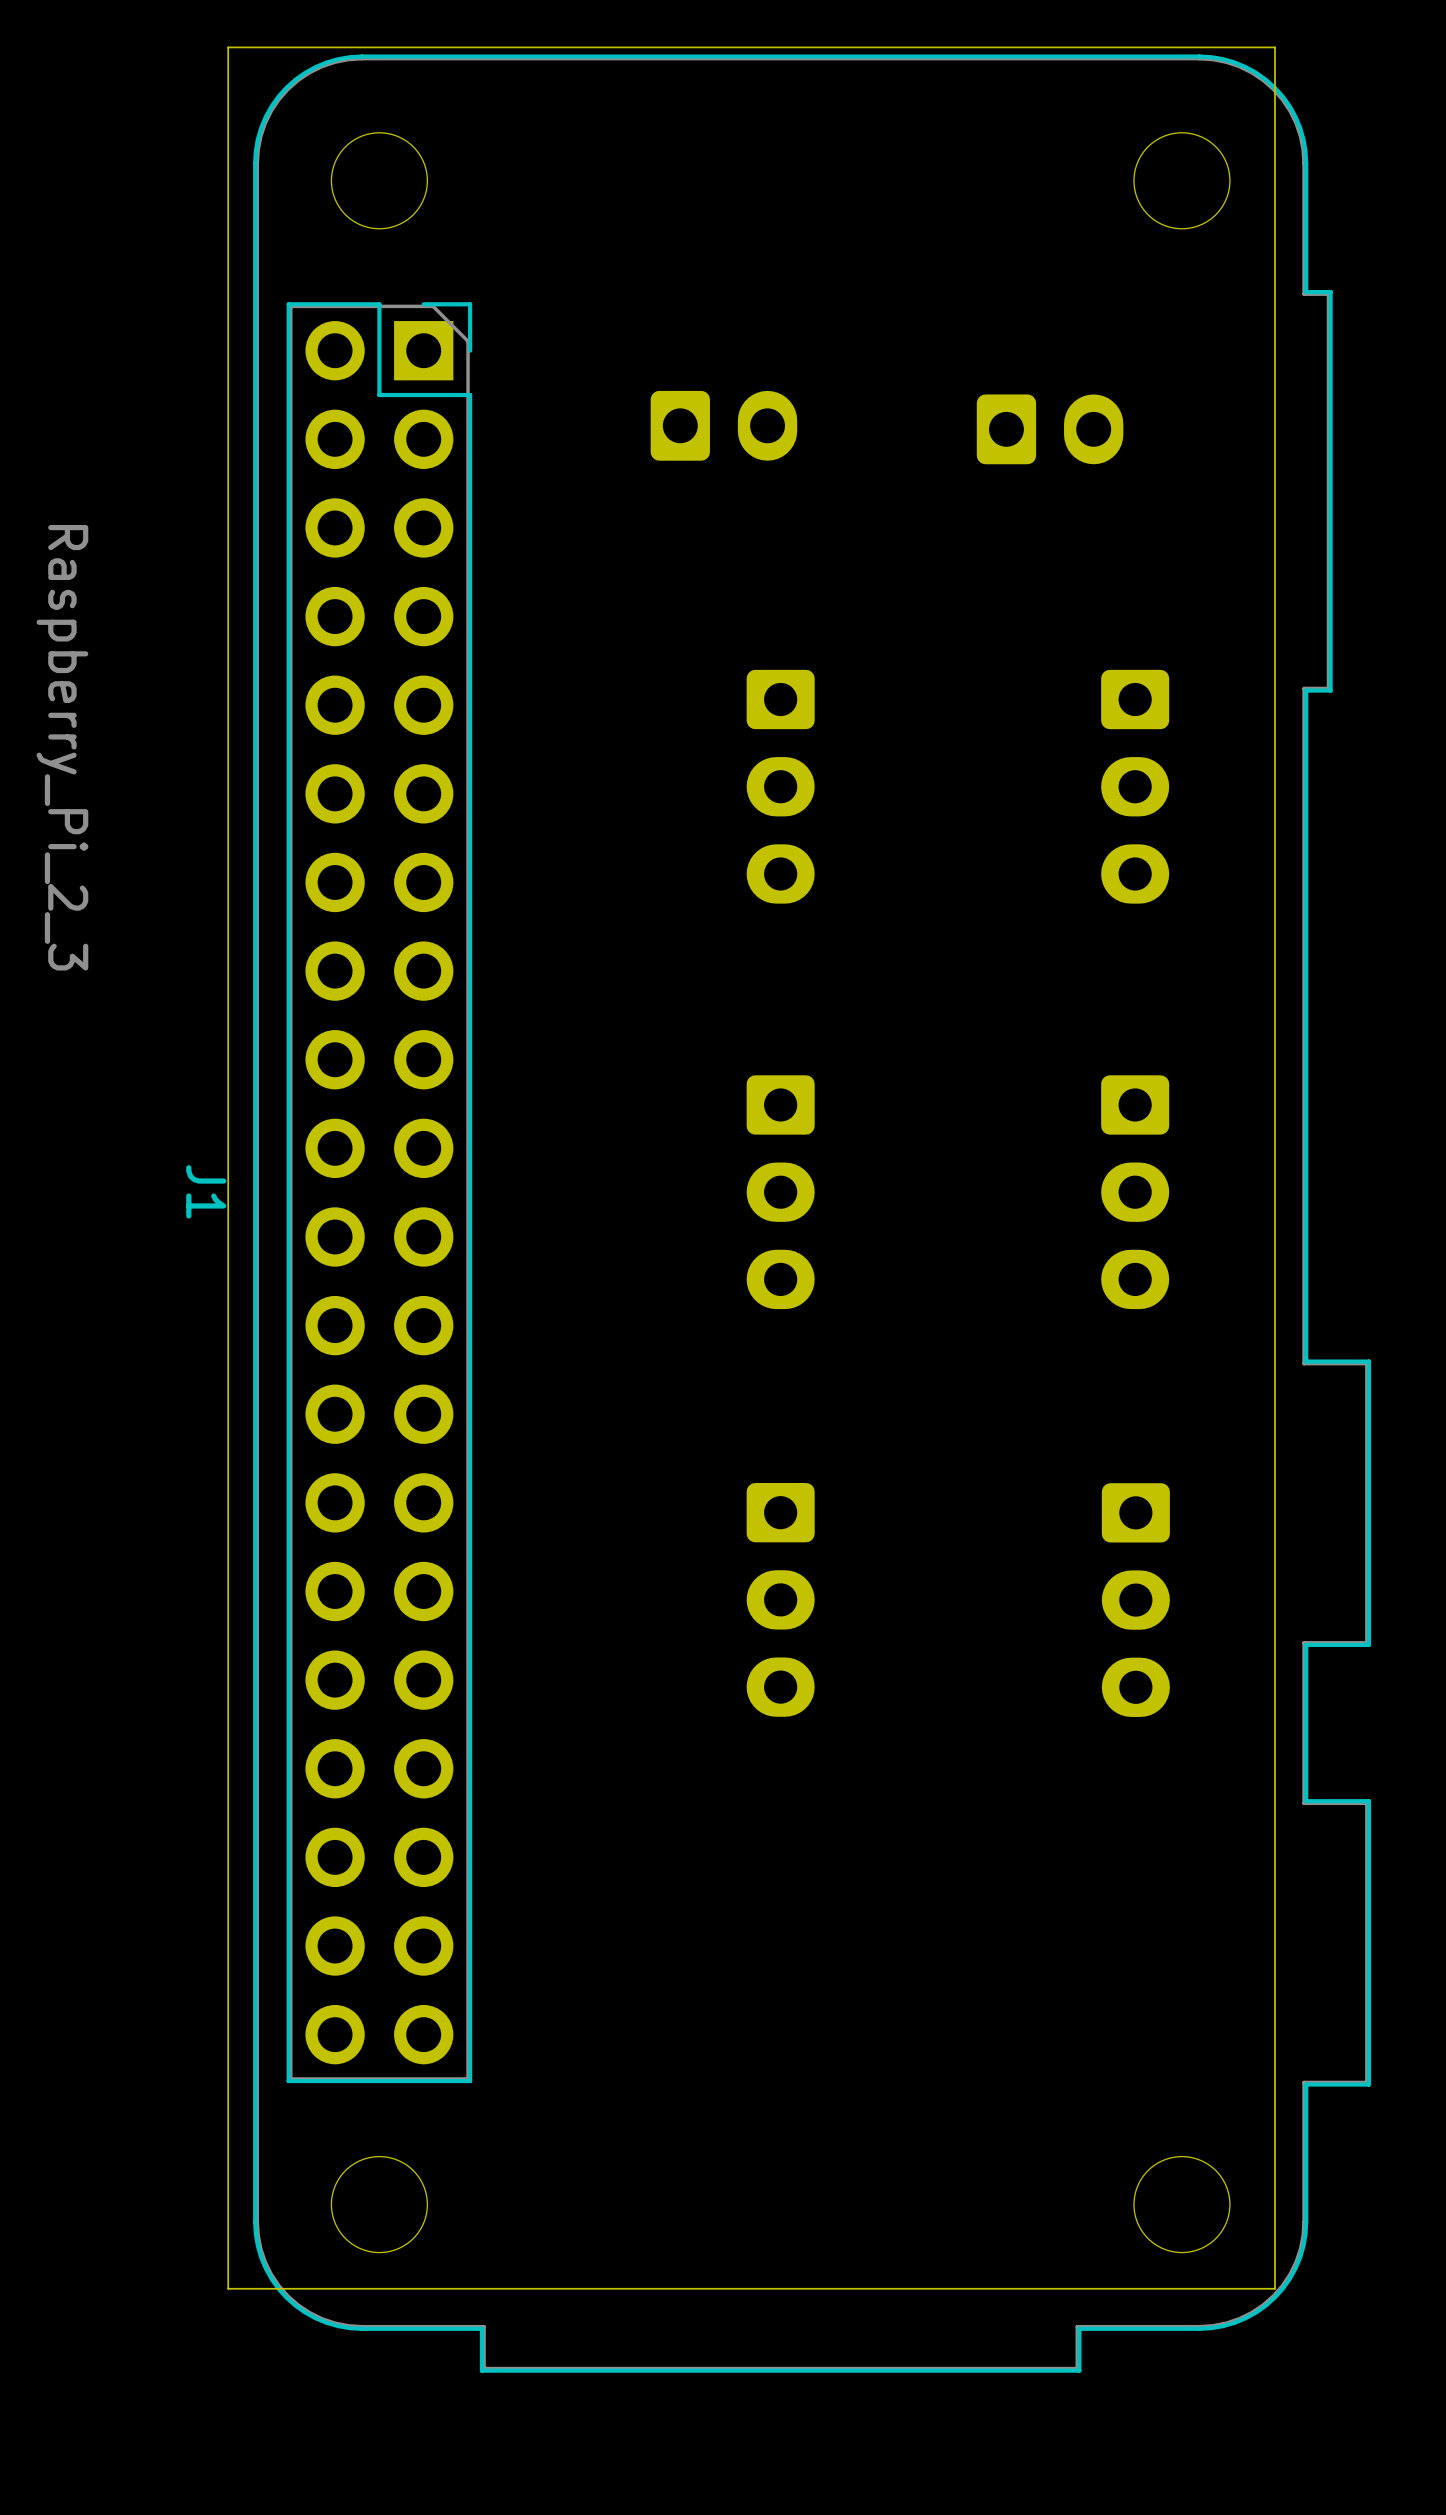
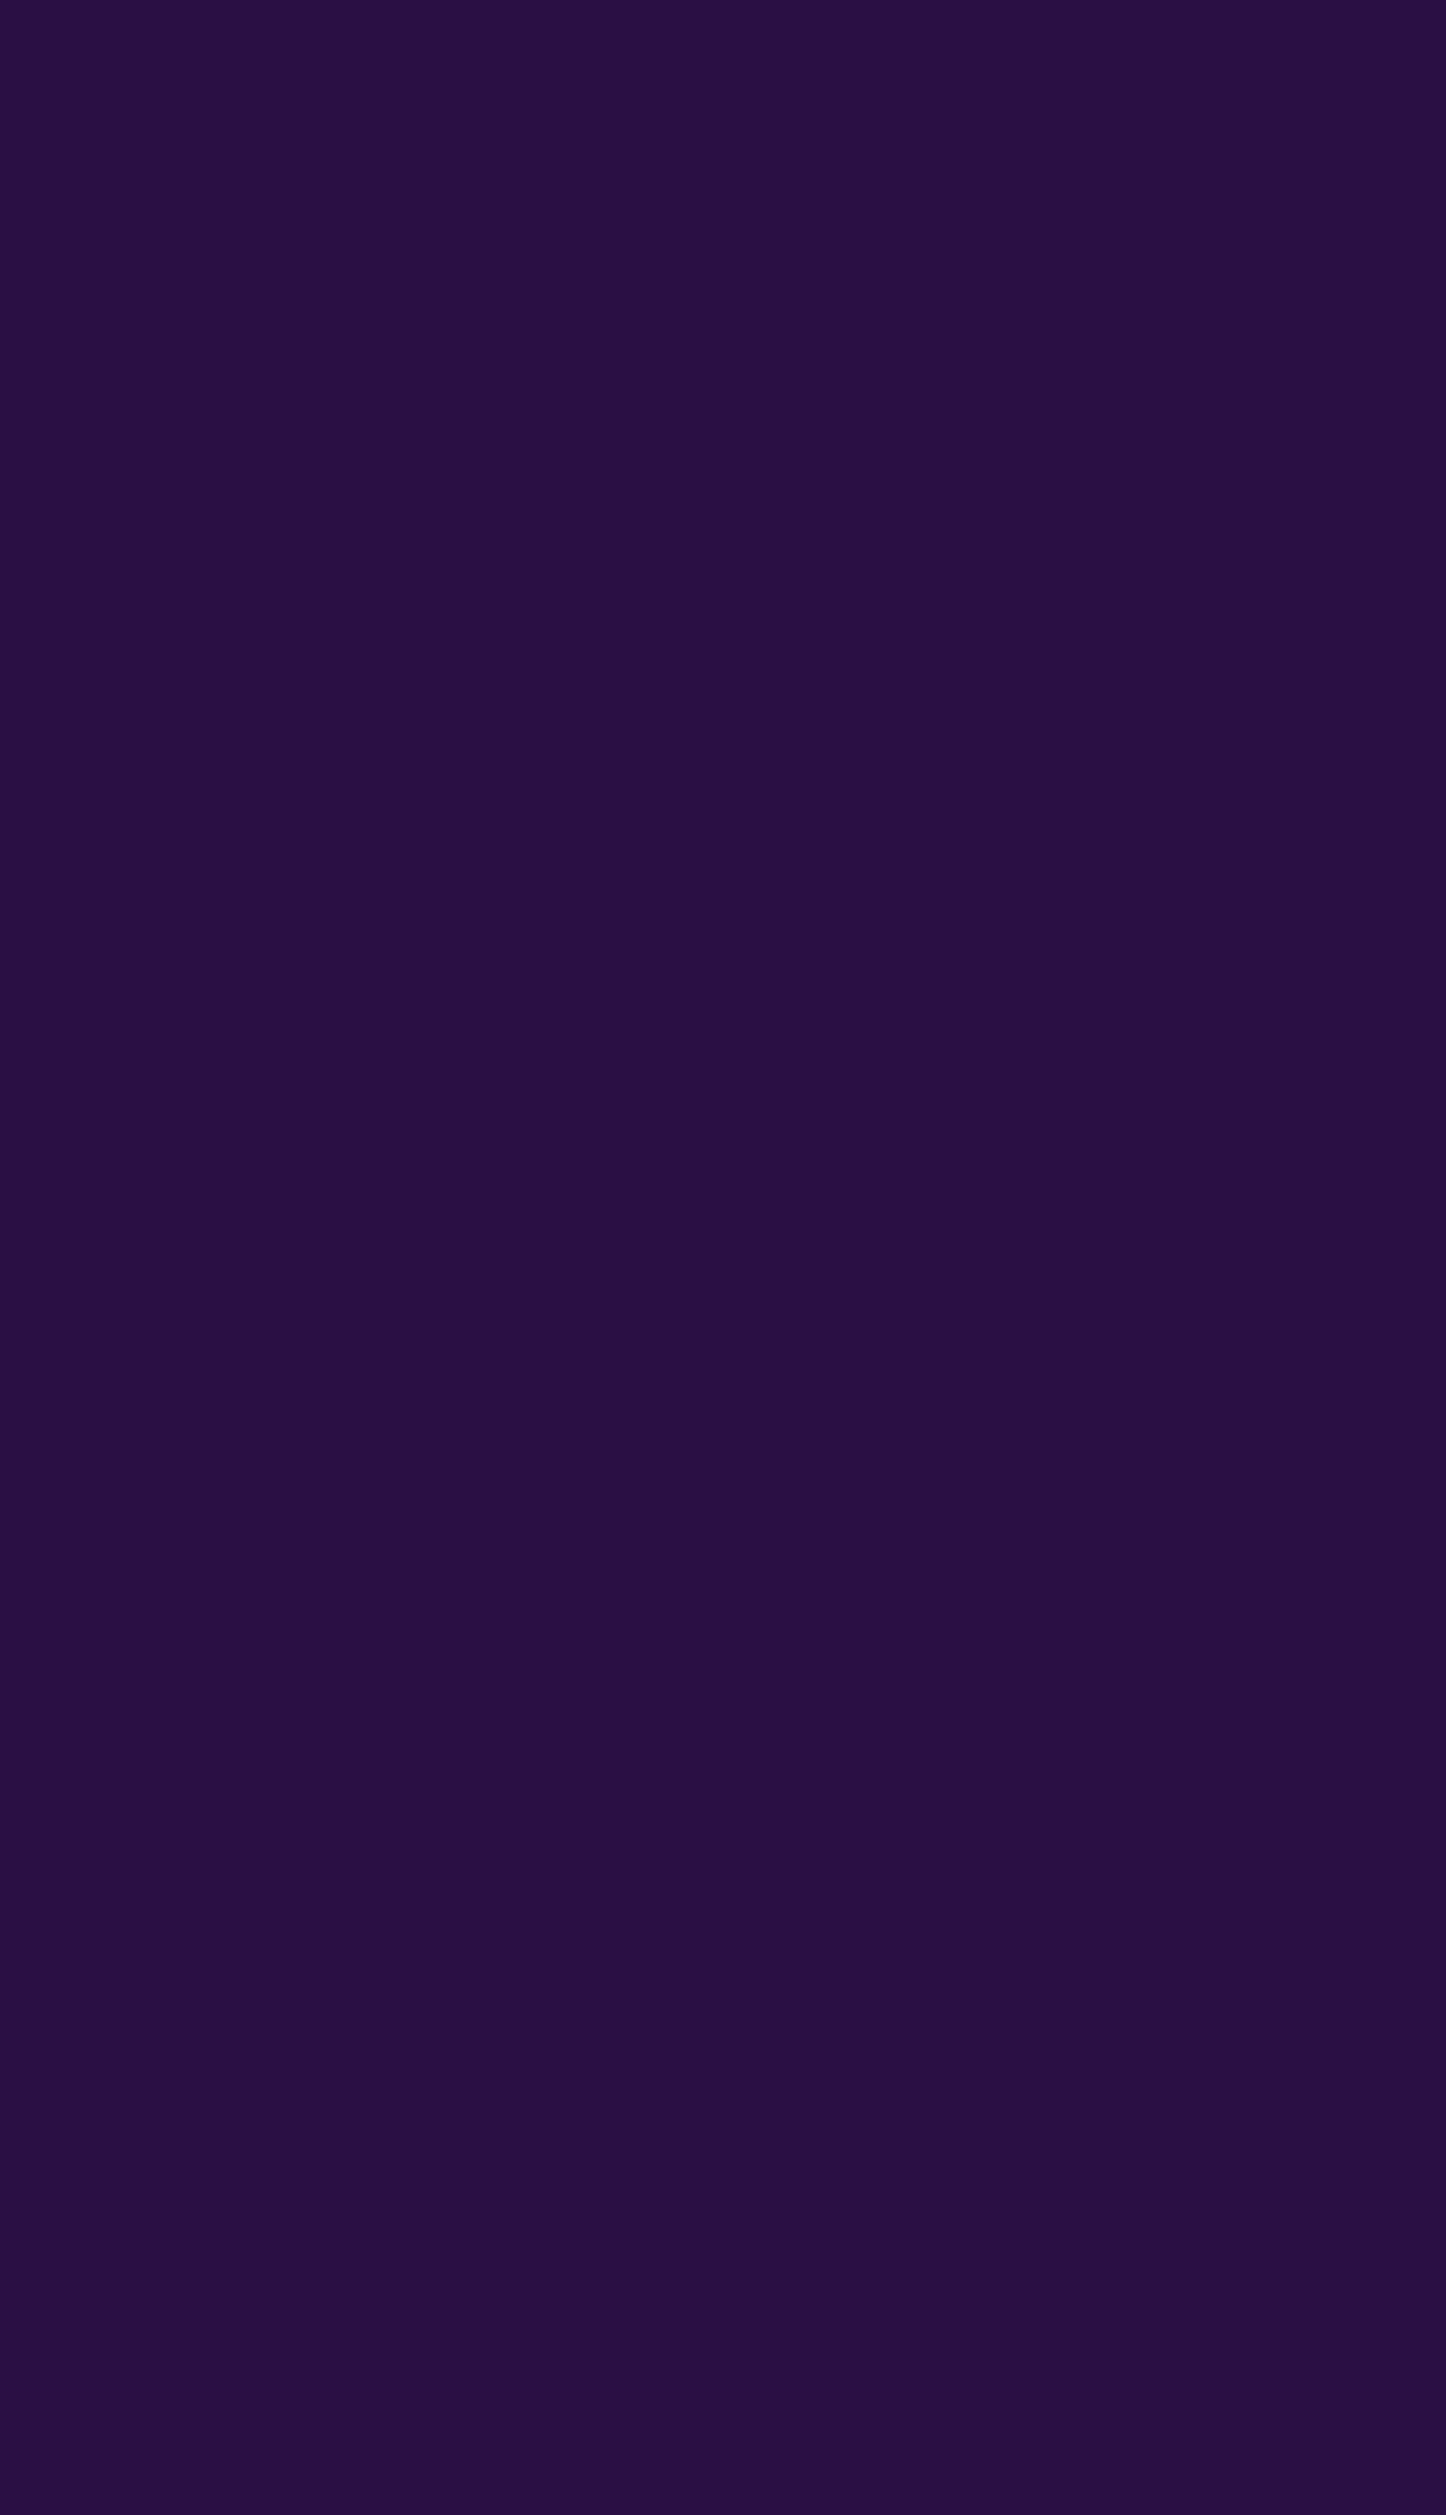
board edge: (1275, 47) (228, 47) (228, 2288) (1275, 2288) (1275, 47) -> none
part: (723, 425) -> none
part: (1050, 429) -> none
part: (780, 786) -> none
part: (1135, 786) -> none
part: (780, 1192) -> none
part: (1135, 1192) -> none
J1: Raspberry_Pi_2_3 (812, 1213) -> none
part: (780, 1599) -> none
part: (1135, 1600) -> none

